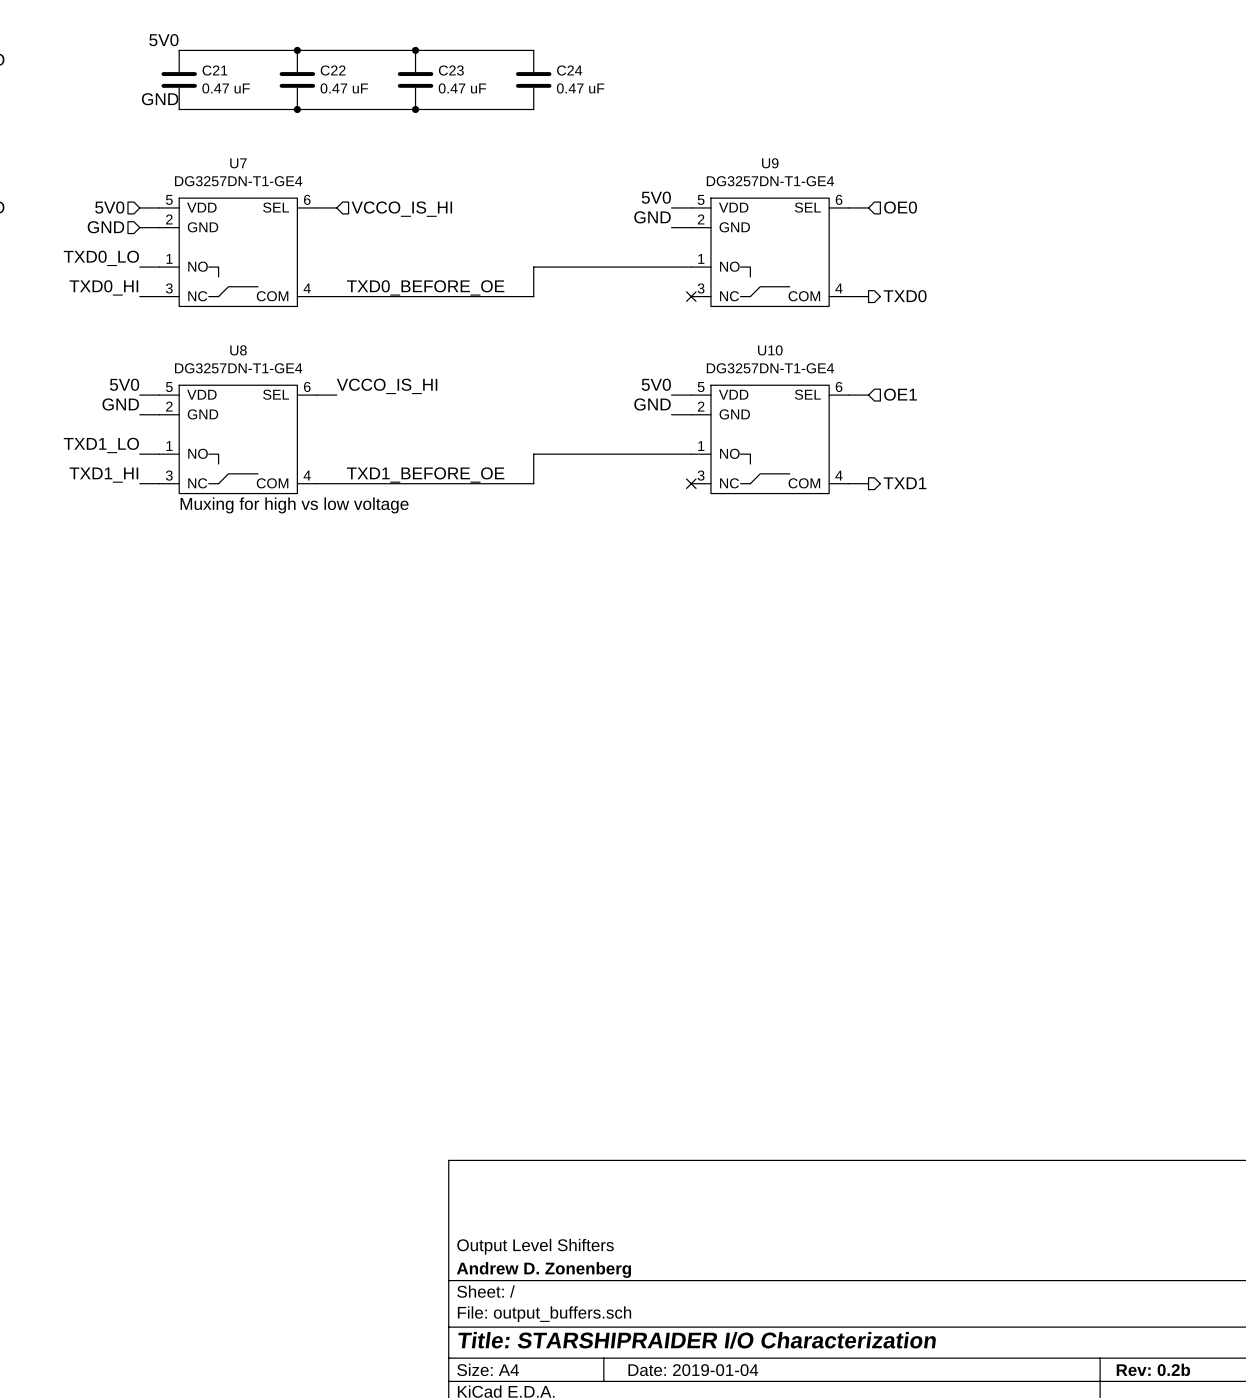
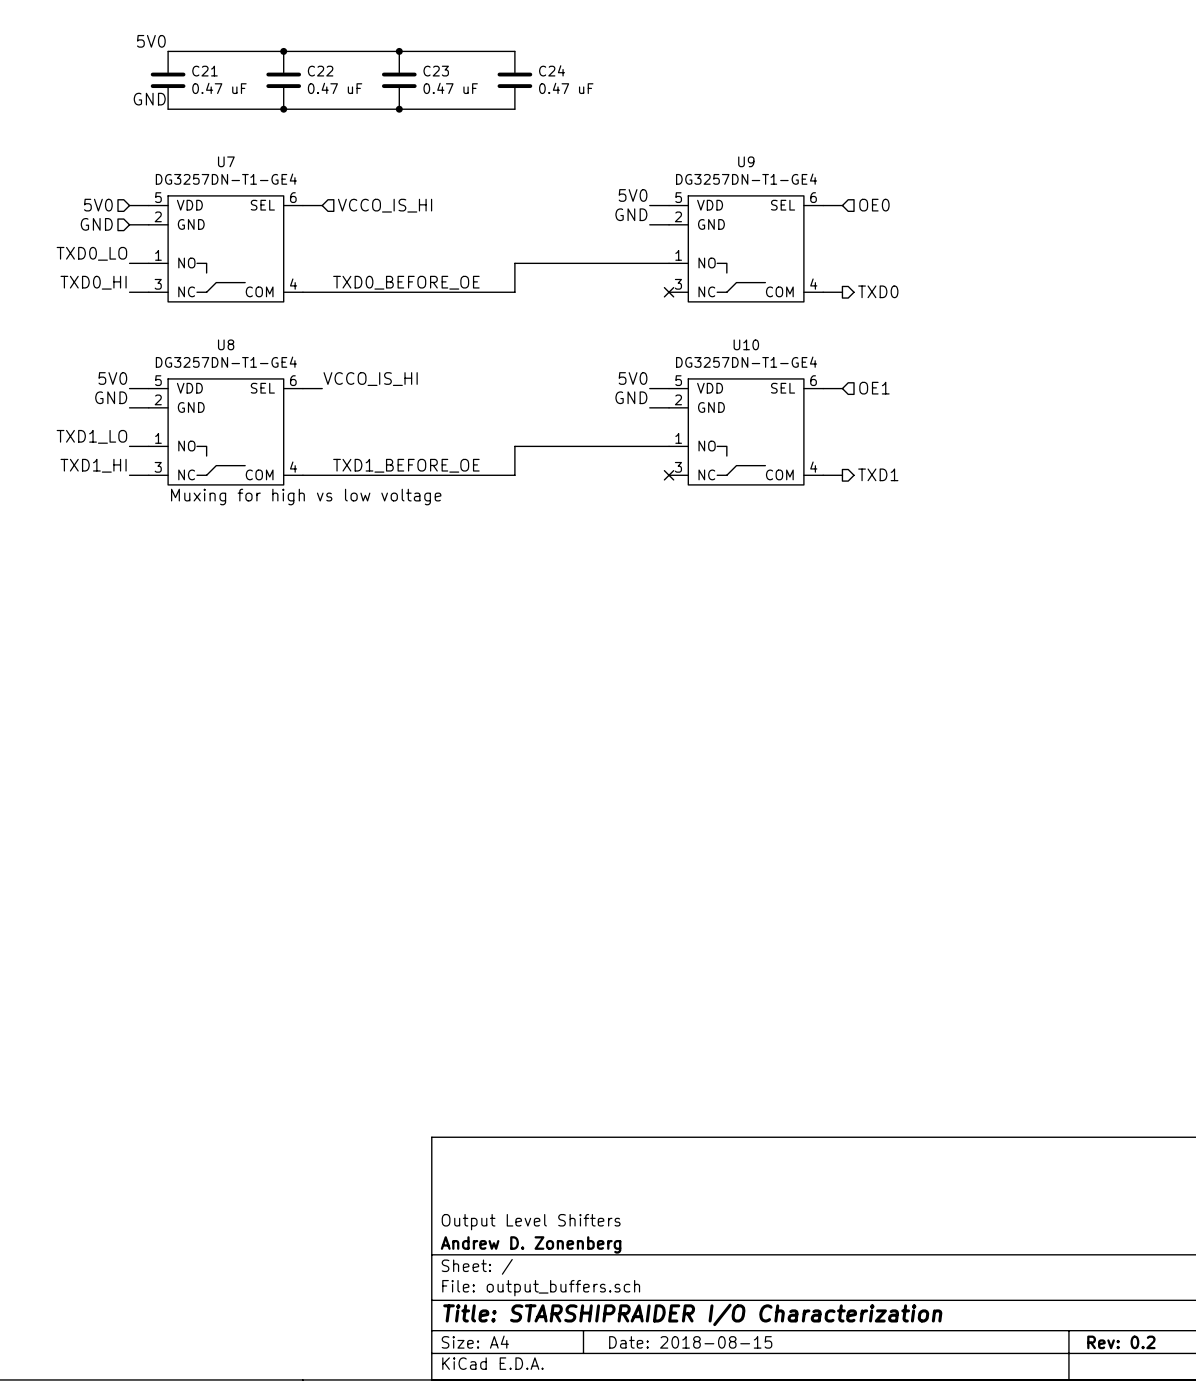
title block: Rev: 0.2b (1153, 1369) -> Rev: 0.2 (1121, 1342)
title block: Date: 2019-01-04 (693, 1370) -> Date: 2018-08-15 (690, 1342)

